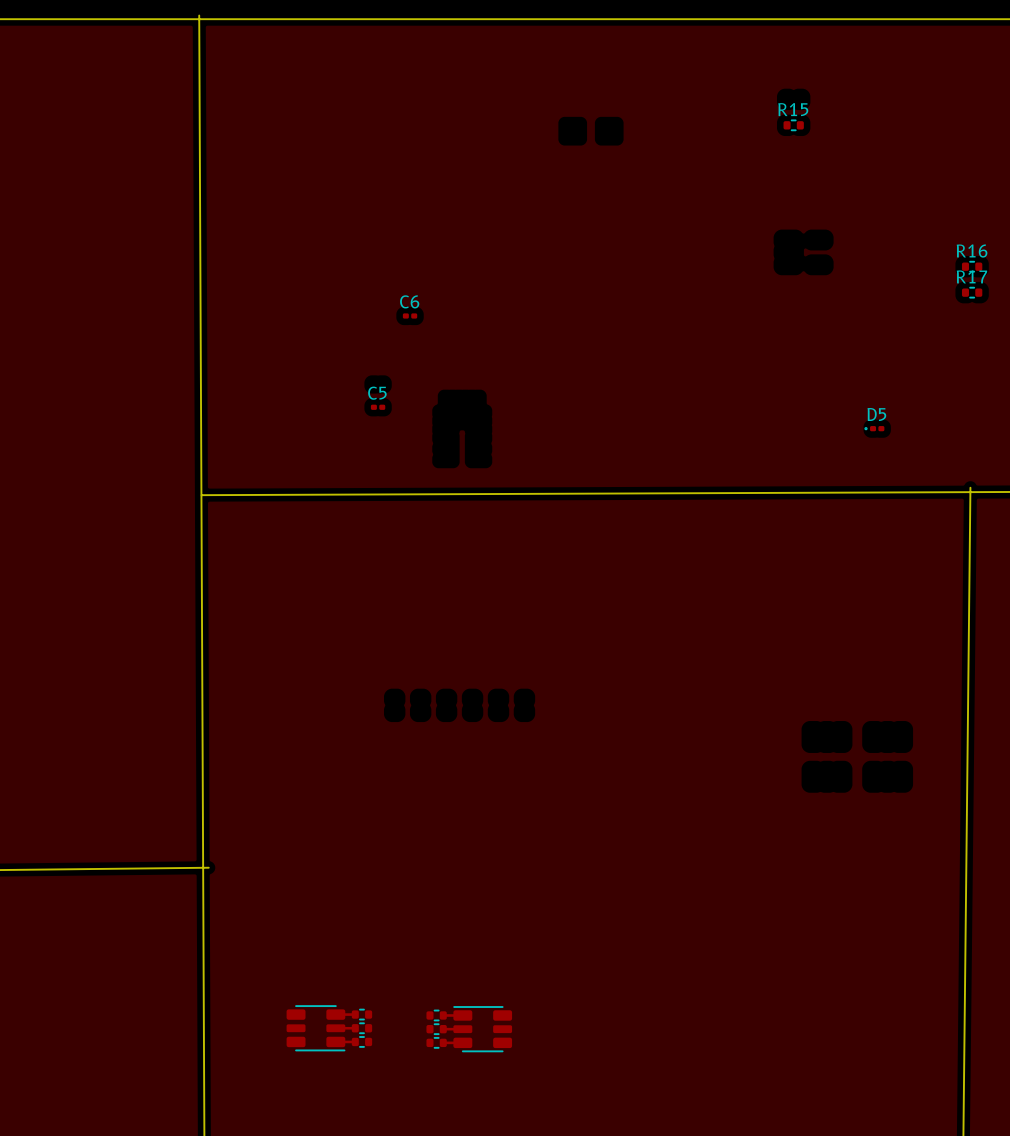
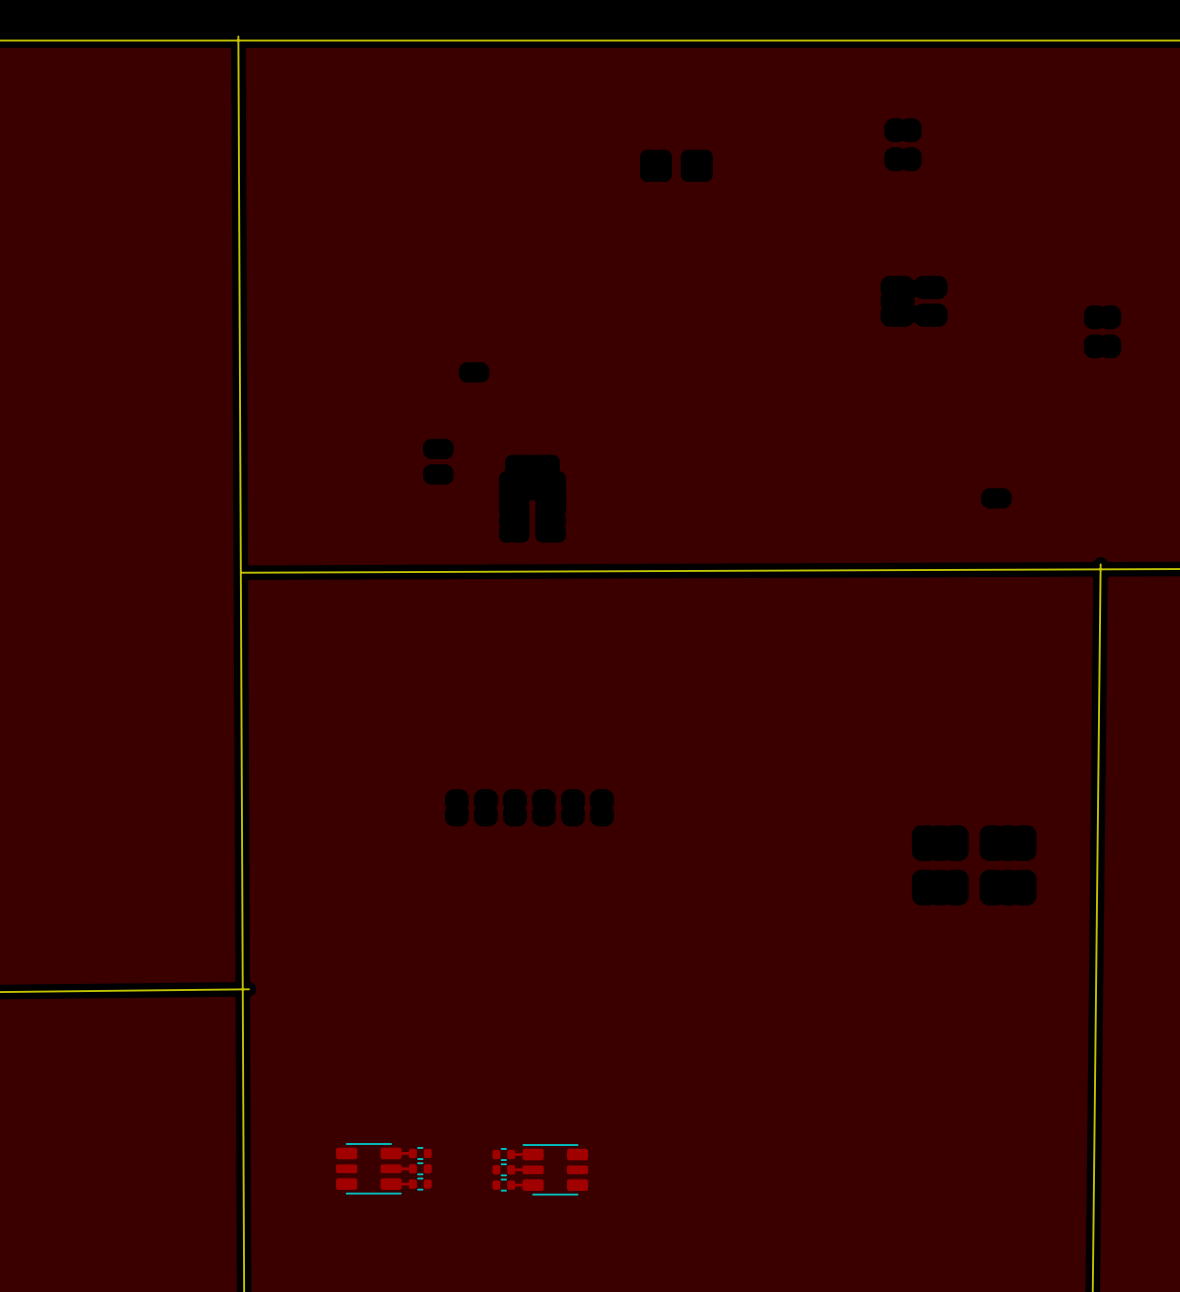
R15: (793, 125) -> none
R16: (972, 266) -> none
R17: (972, 292) -> none
C6: (410, 315) -> none
C5: (378, 407) -> none
D5: (874, 428) -> none

